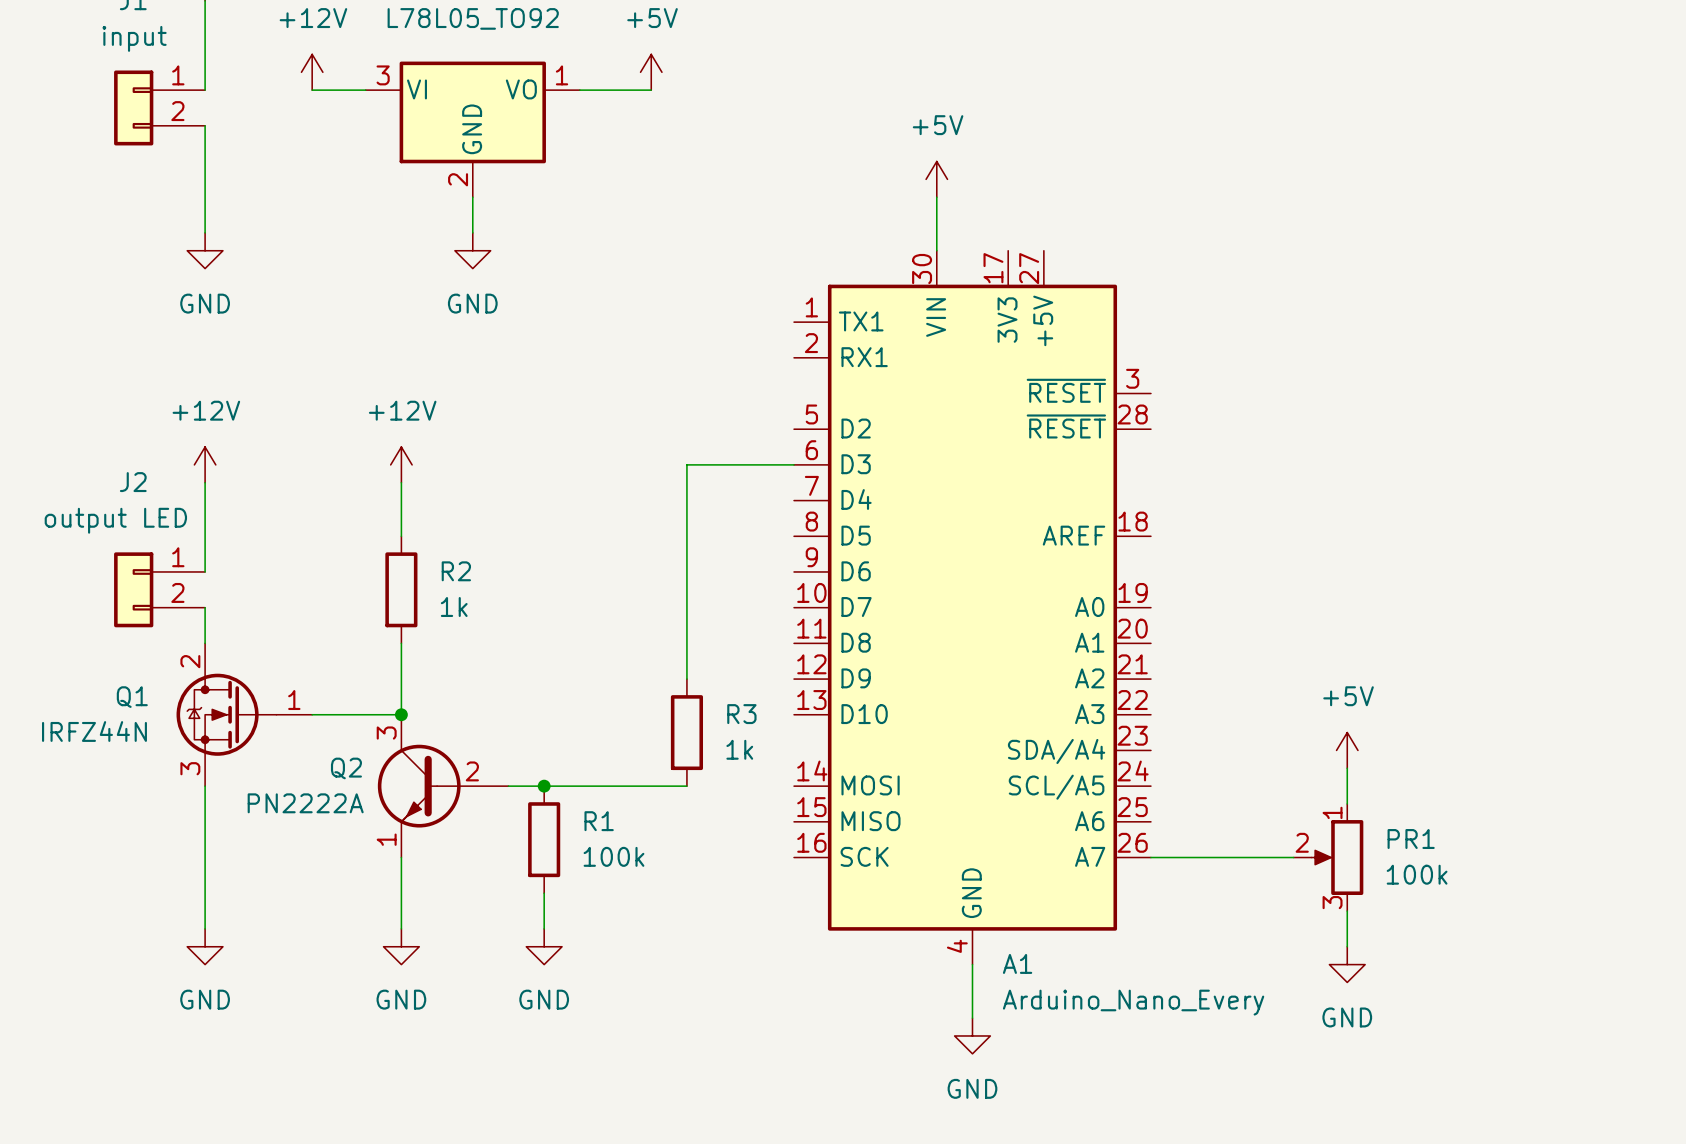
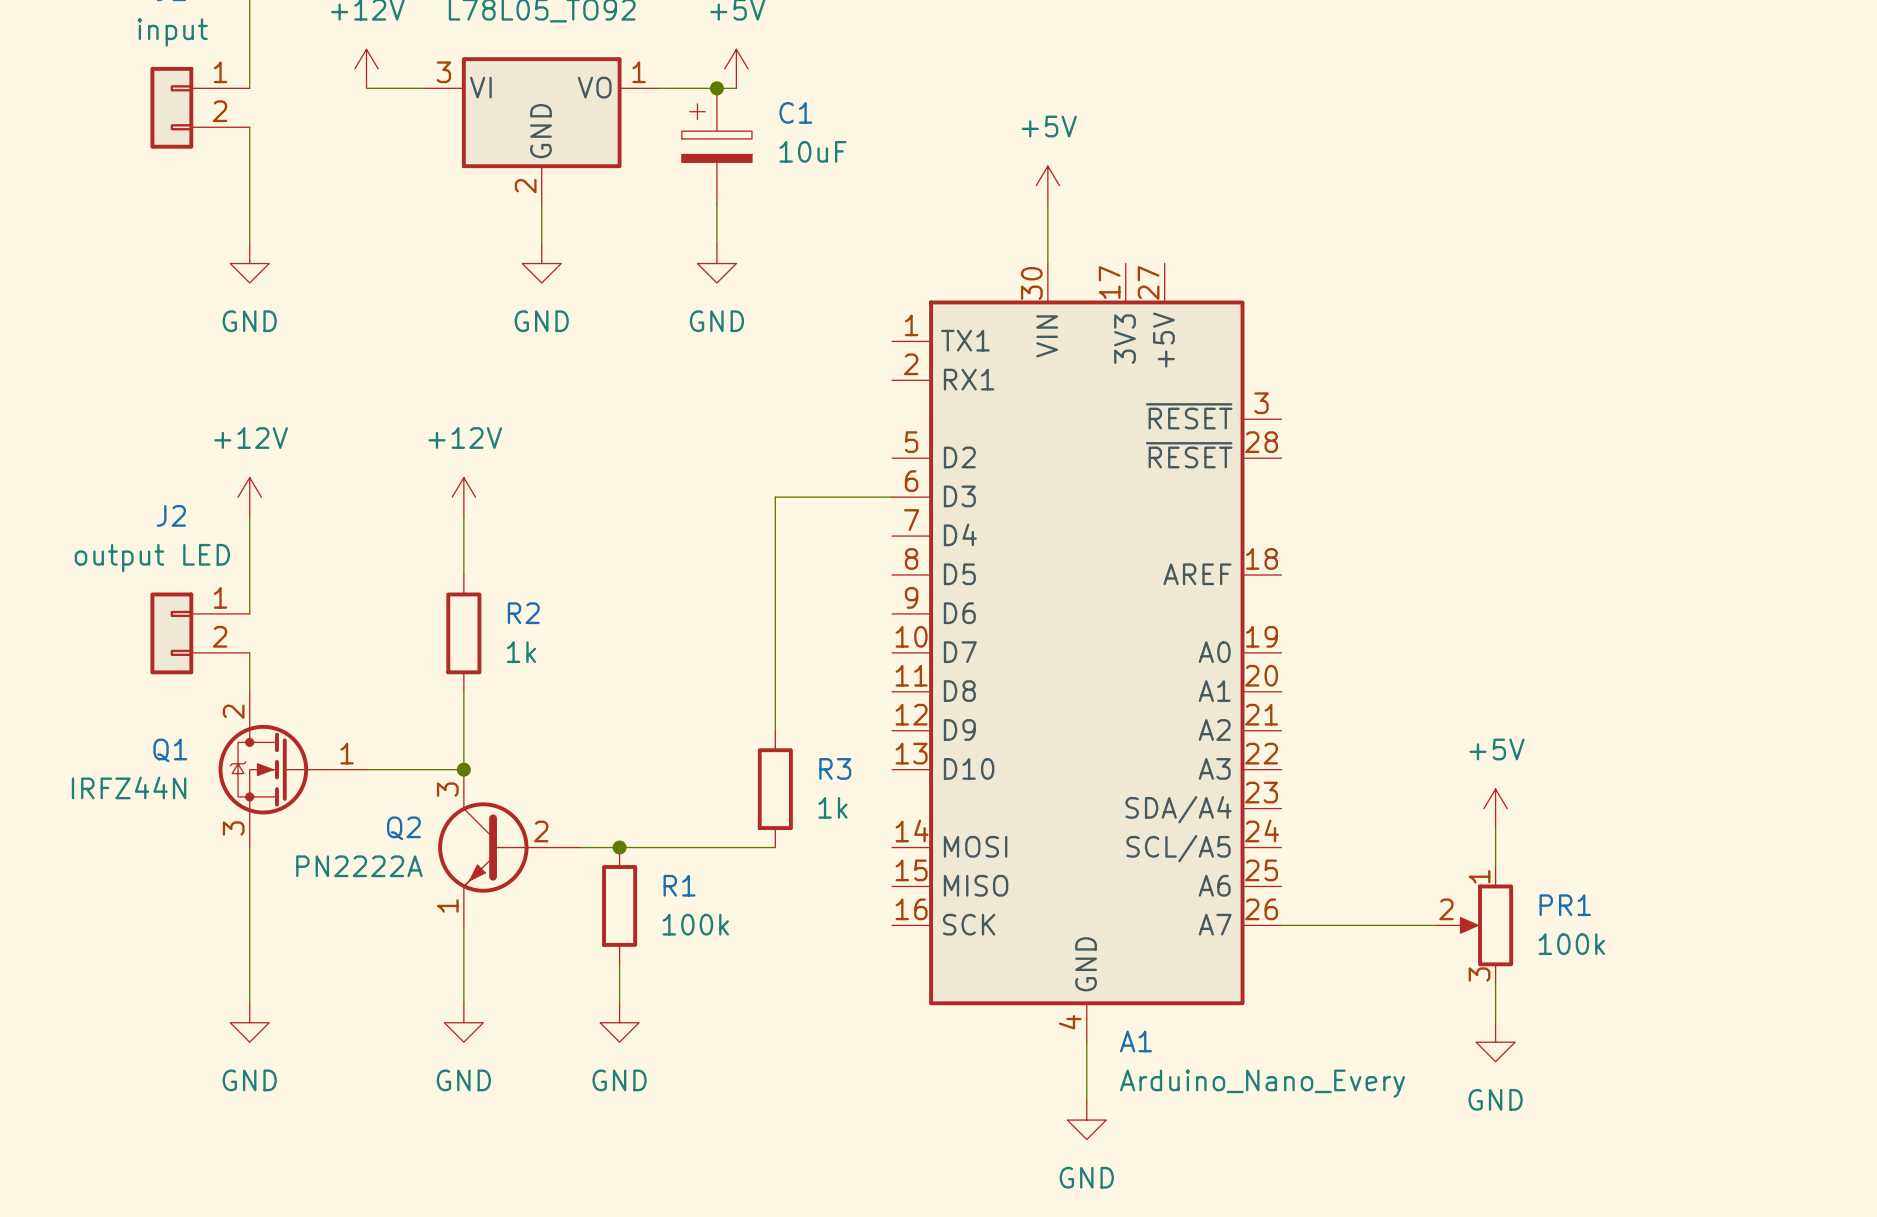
junction: none -> (716, 88)
C1: none -> 10uF (716, 146)
wire: none -> (716, 205) (716, 244)
power symbol: none -> GND (716, 263)

